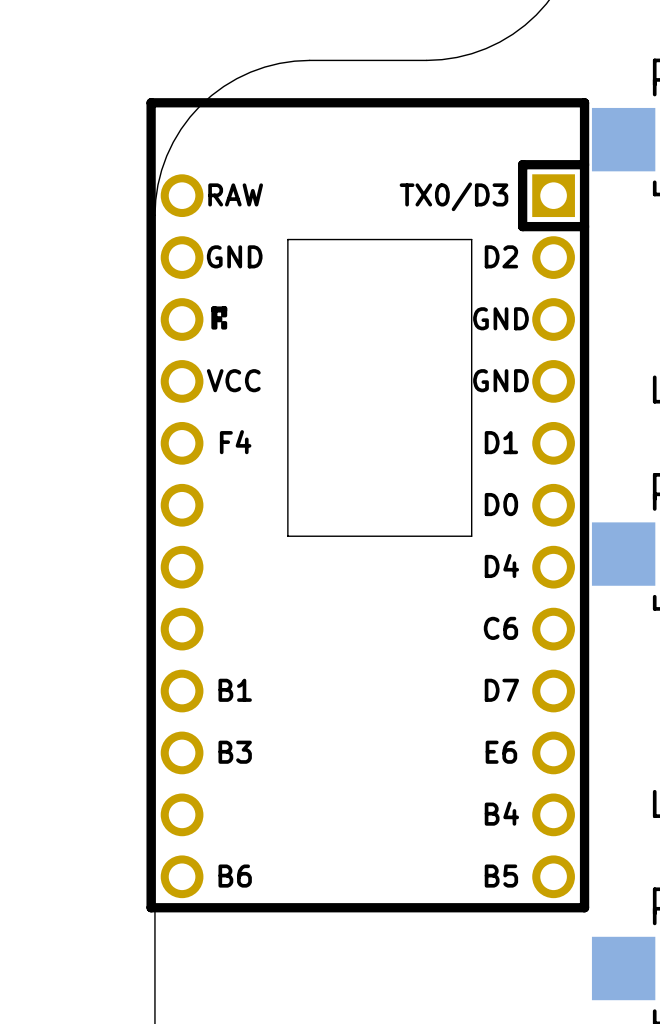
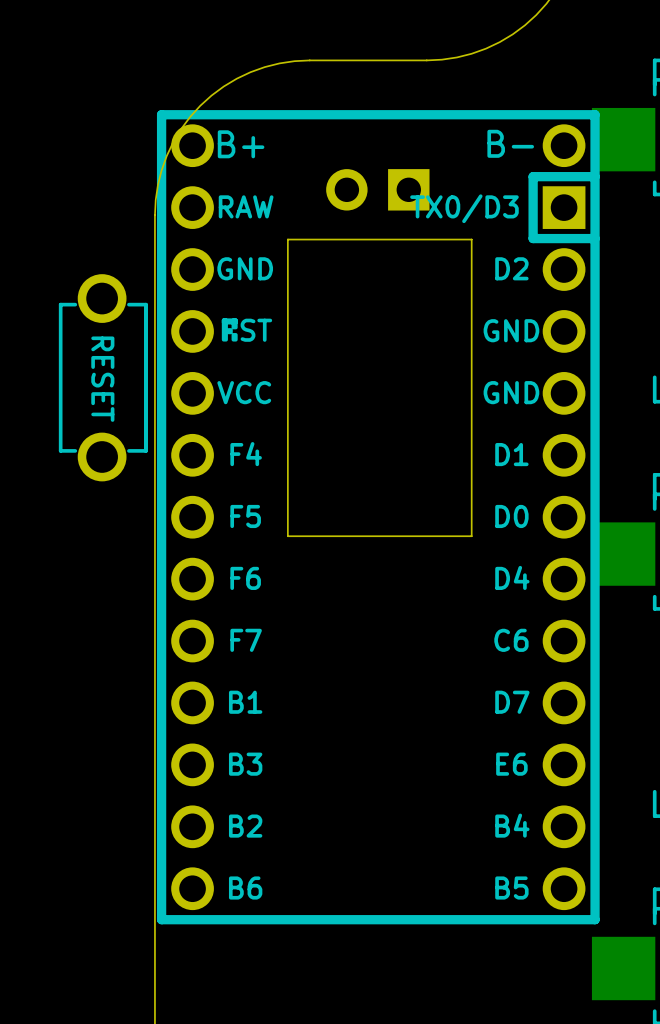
part footprint: [146, 98, 590, 913] -> [156, 110, 600, 925]
part: none -> (377, 189)
part: none -> (103, 377)

